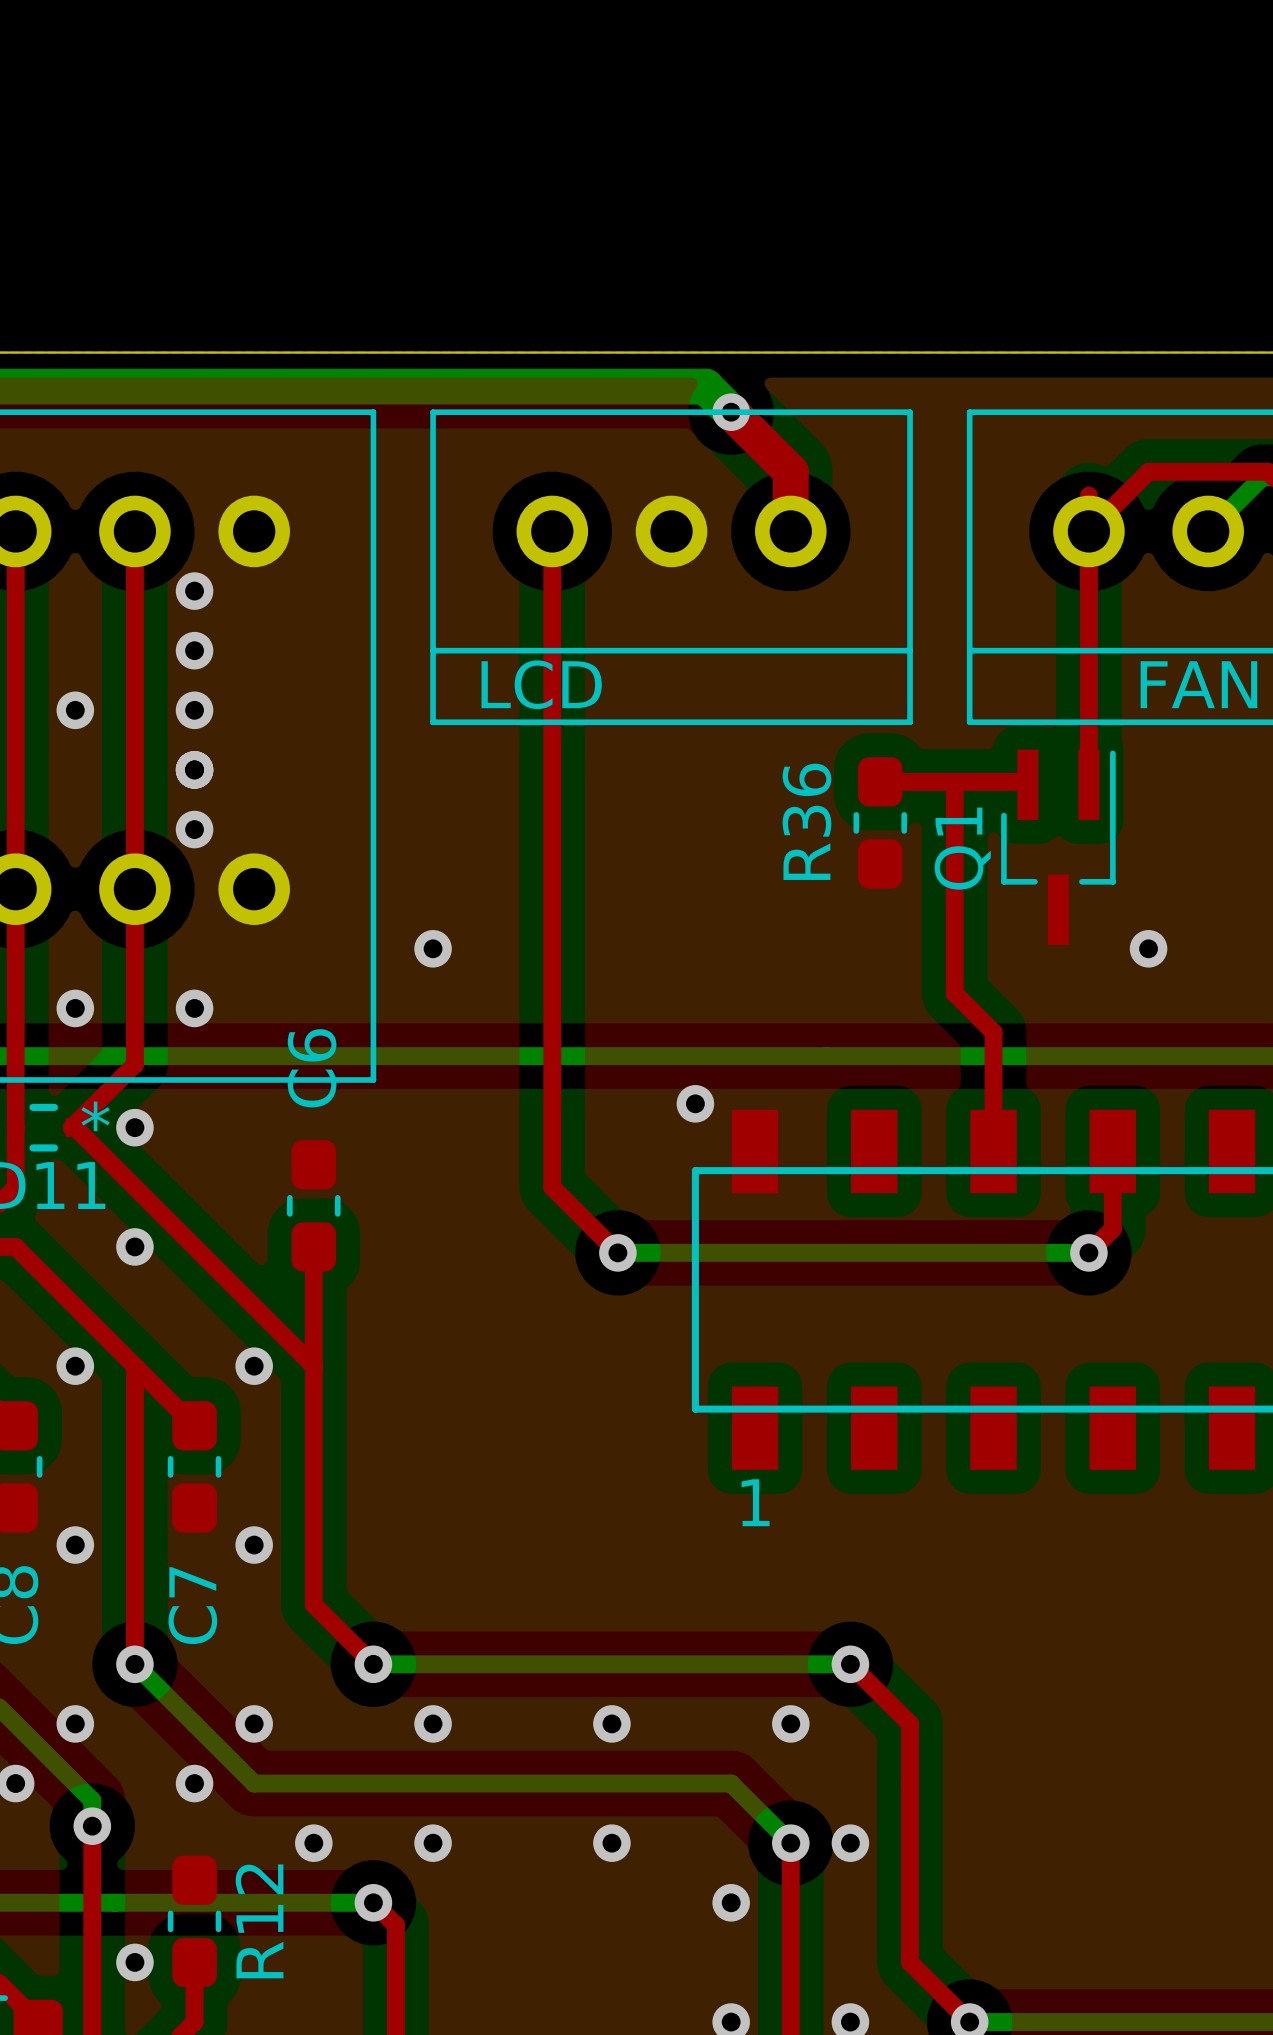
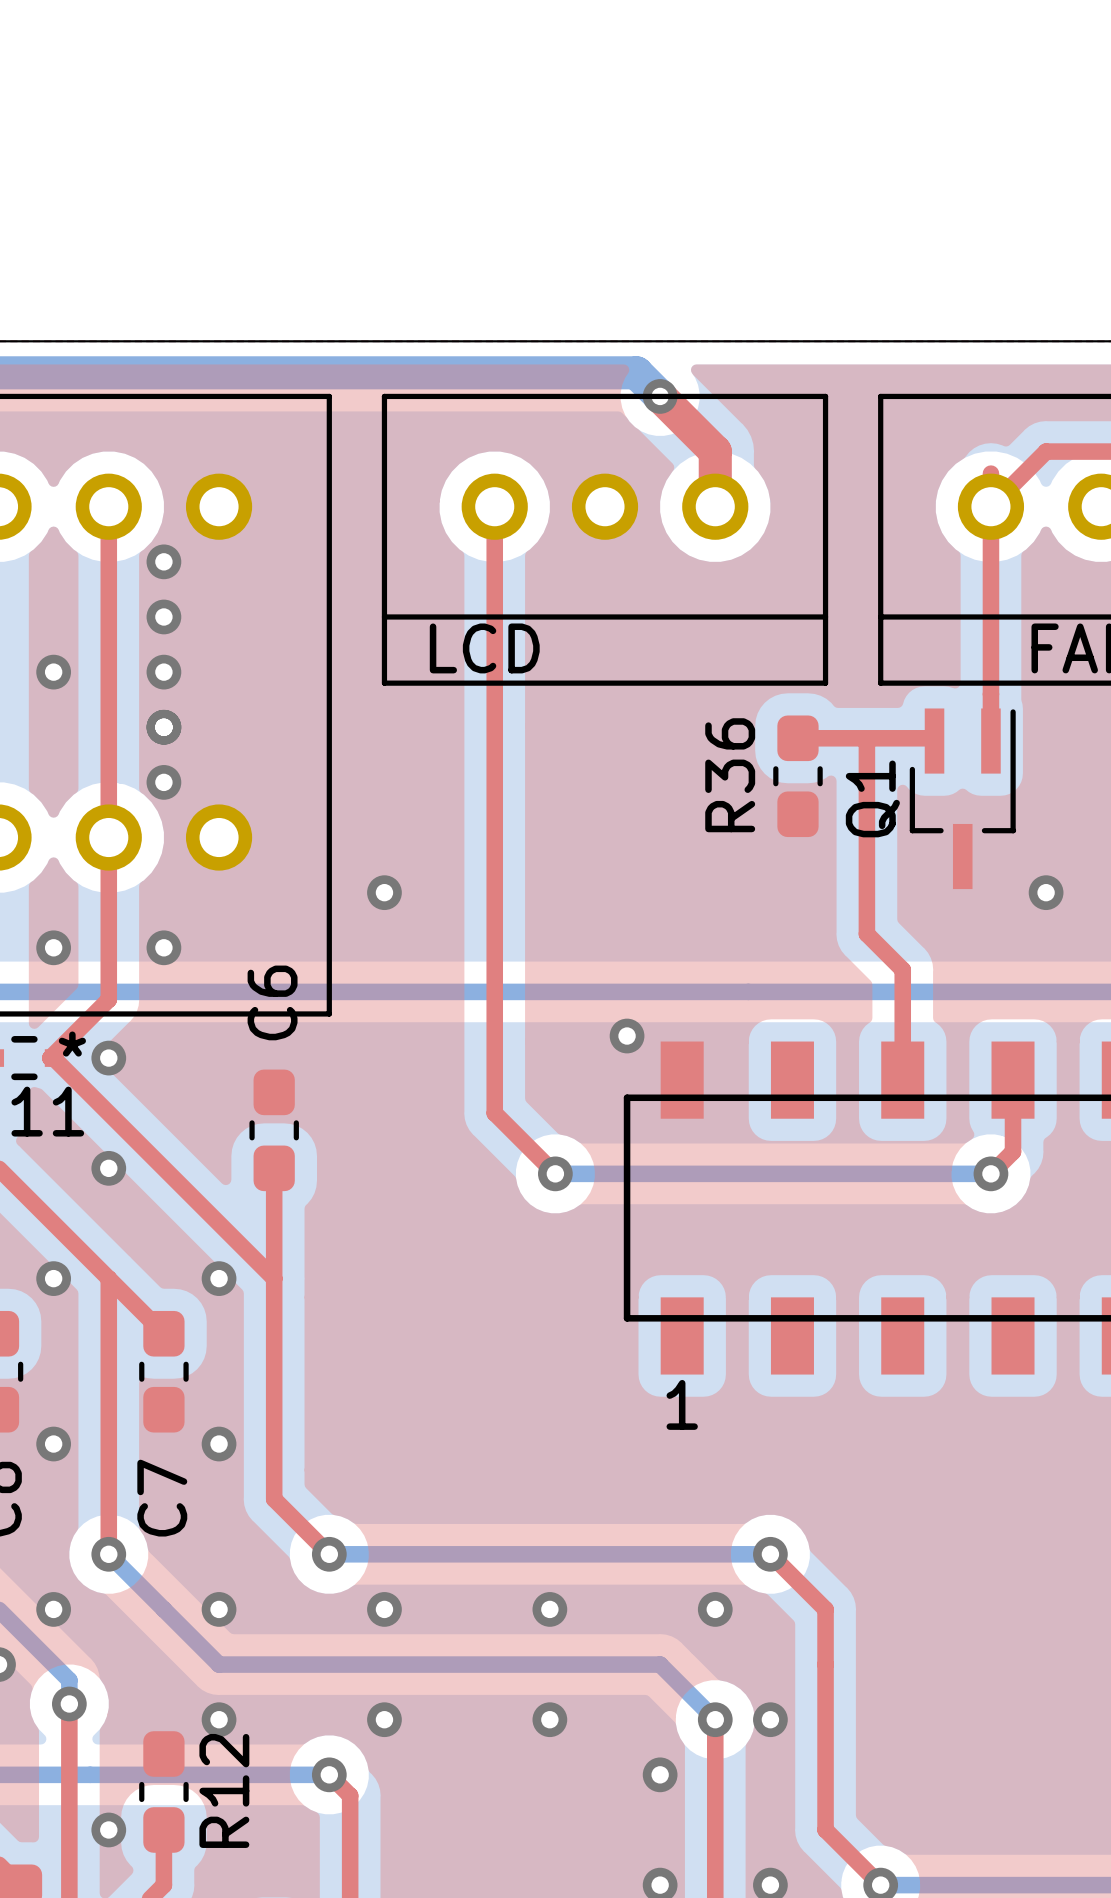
via: (194, 1783) -> none
via: none -> (219, 1719)
via: (313, 1843) -> none

